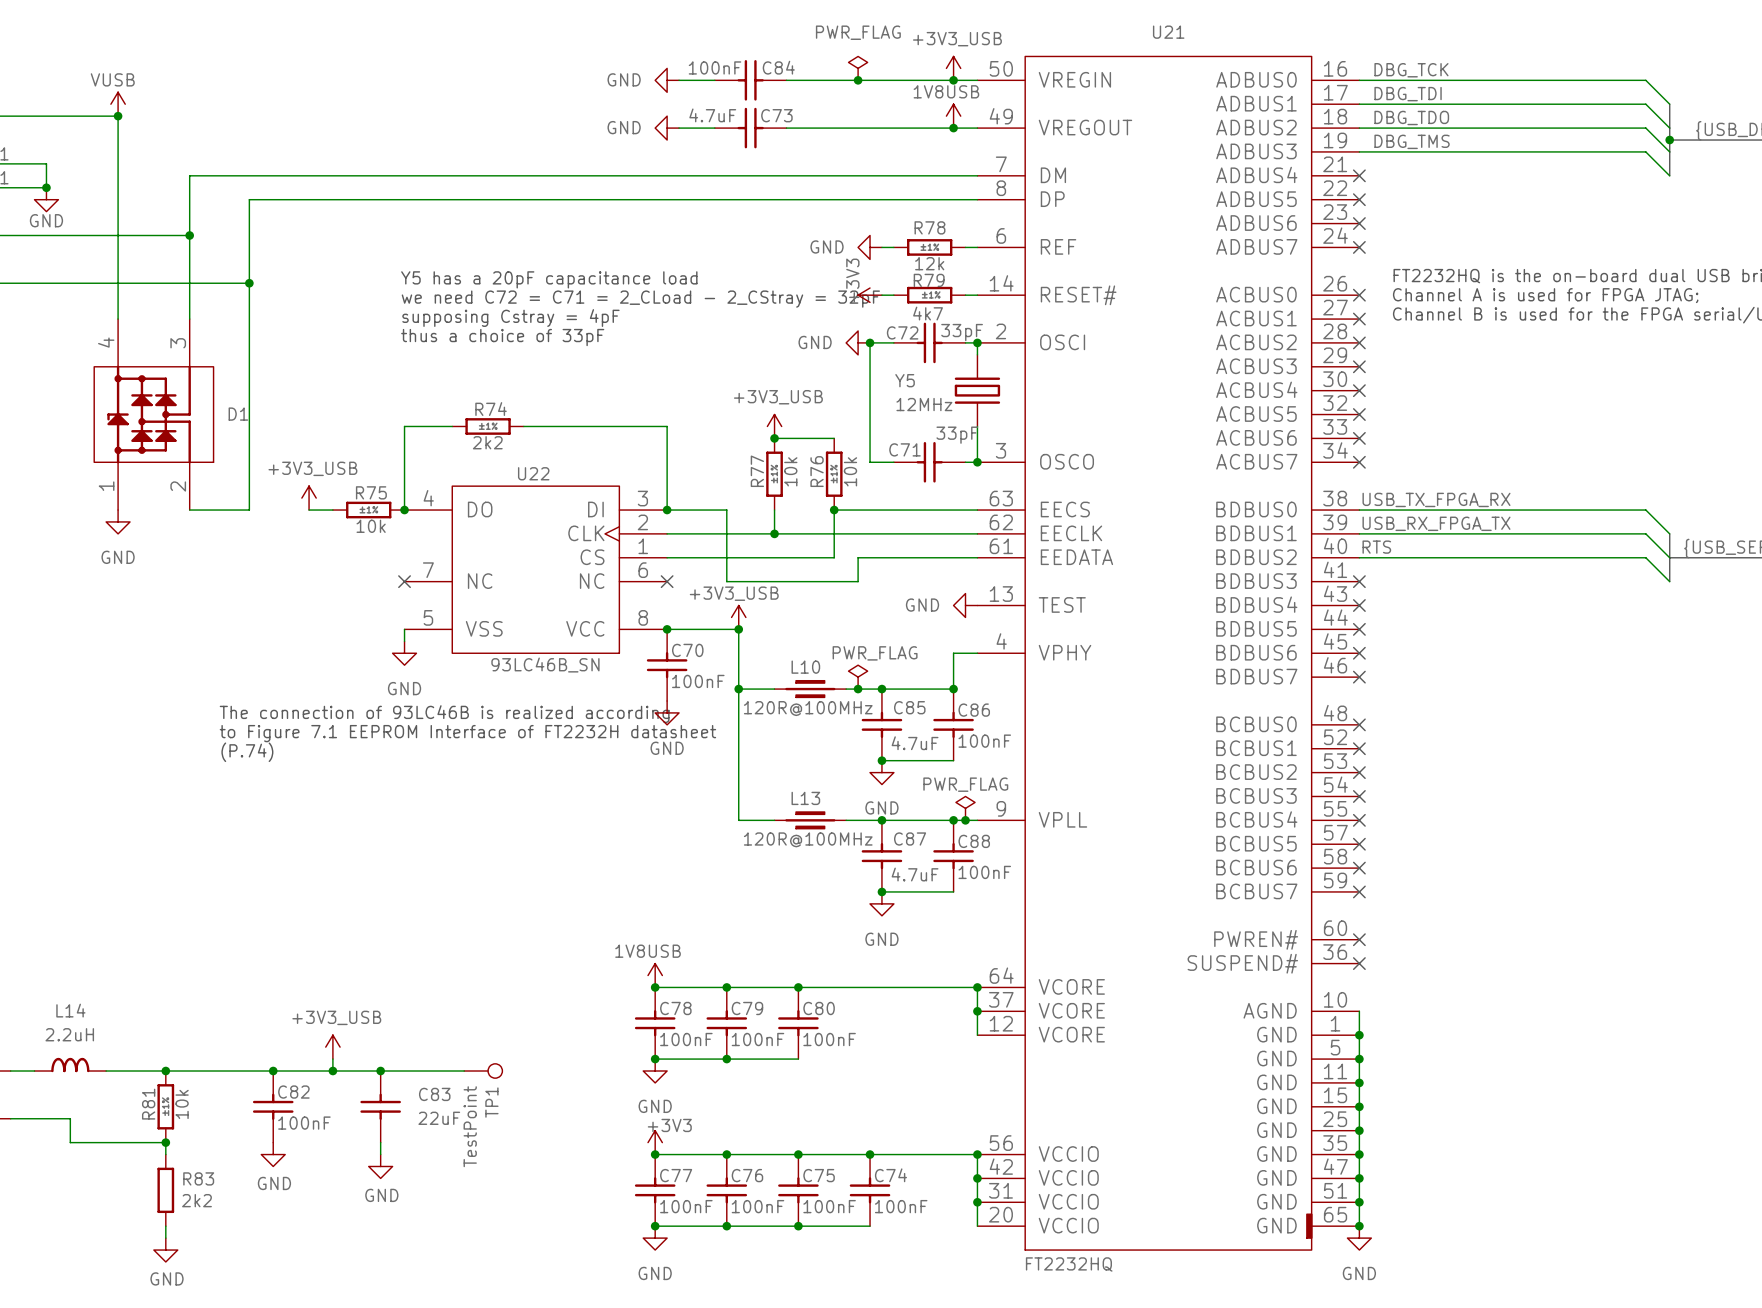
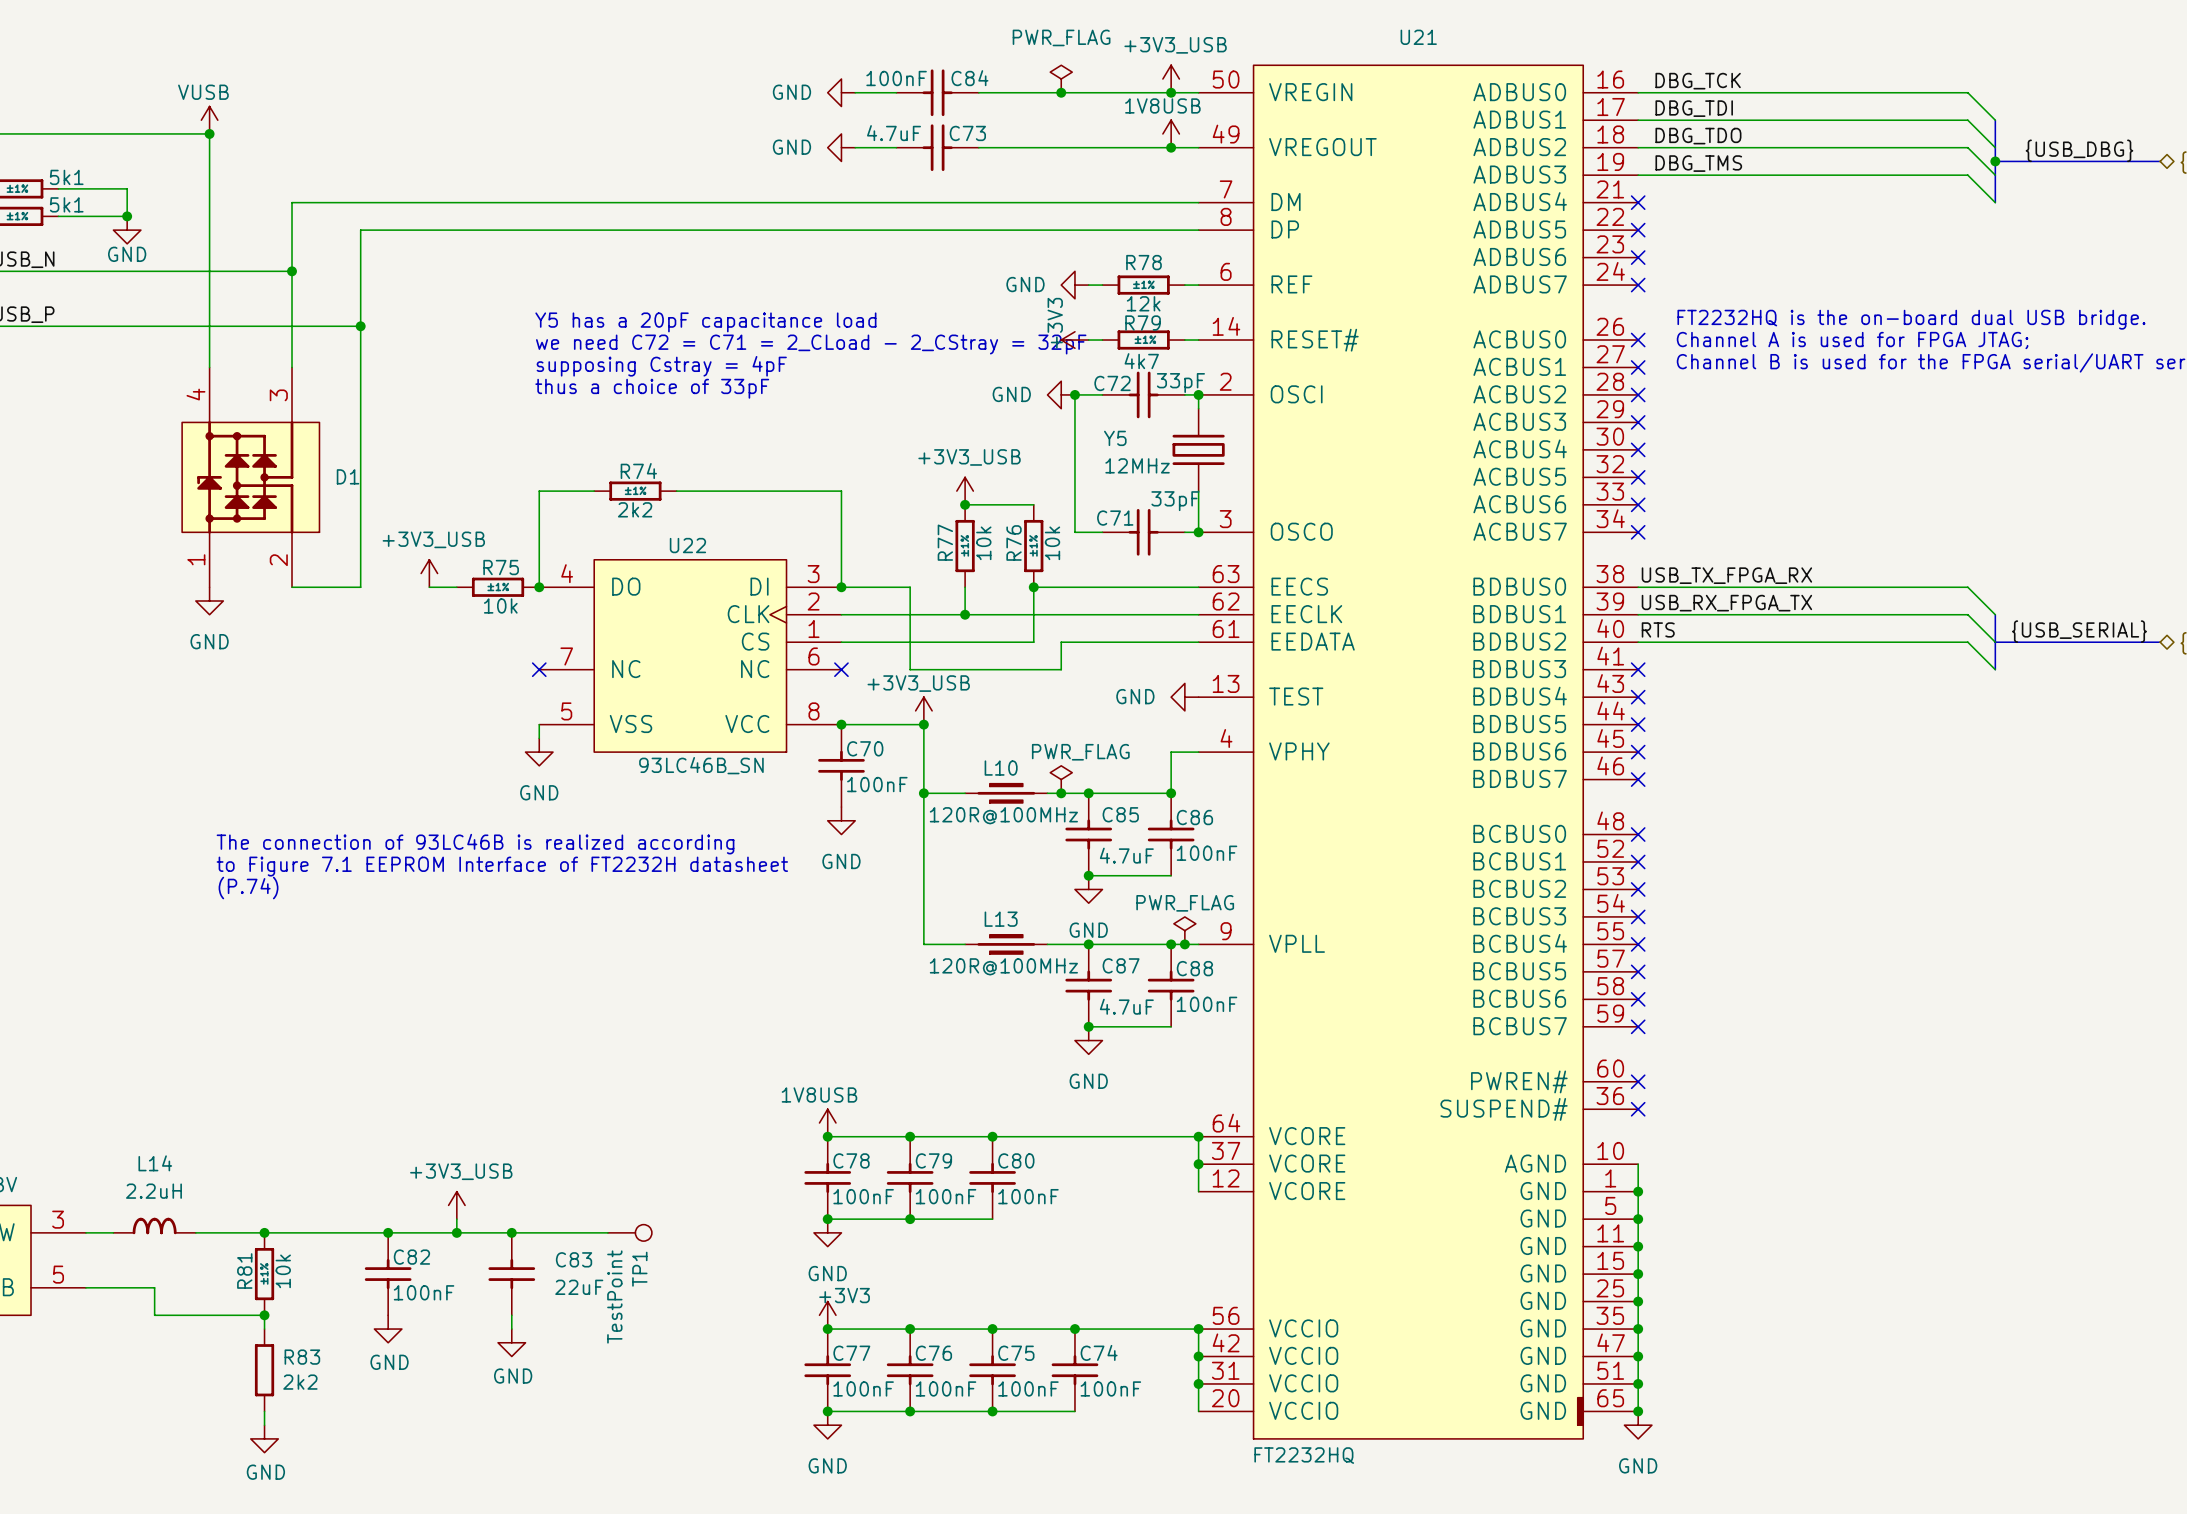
text position: The connection of 93LC46B is realized according (444, 714) -> The connection of 93LC46B is realized according (475, 844)
text position: to Figure 7.1 EEPROM Interface of FT2232H datasheet (467, 733) -> to Figure 7.1 EEPROM Interface of FT2232H datasheet (502, 866)
text position: (P.74) (247, 752) -> (P.74) (248, 888)

